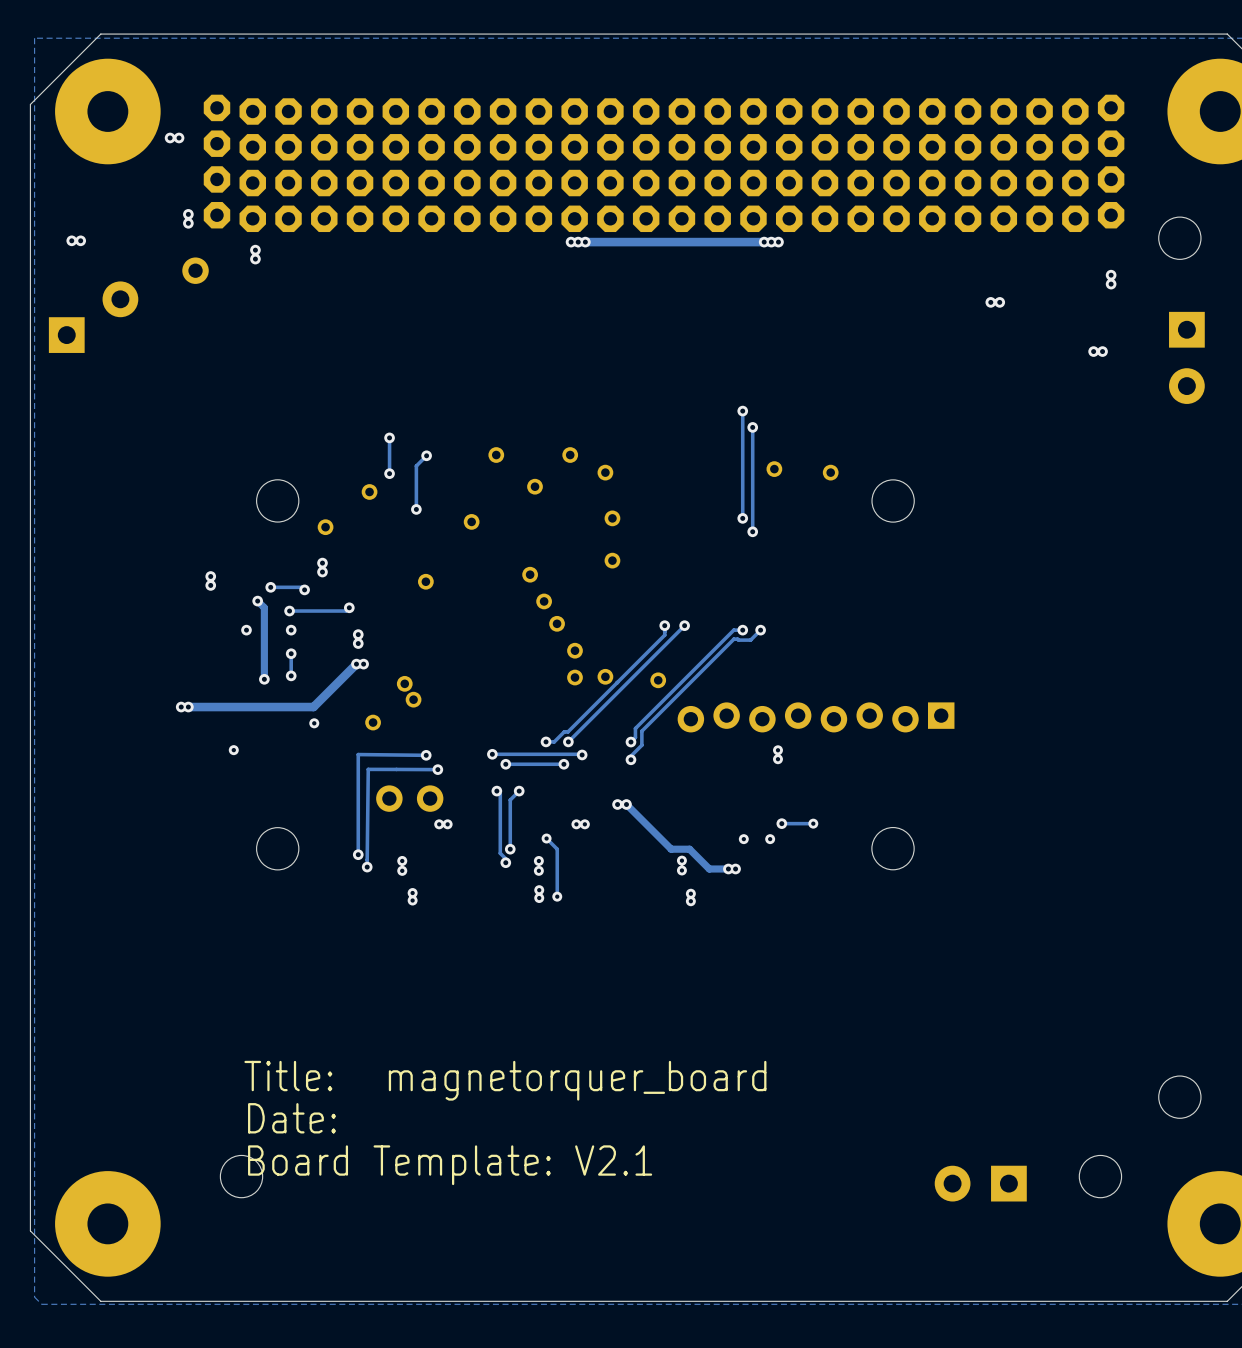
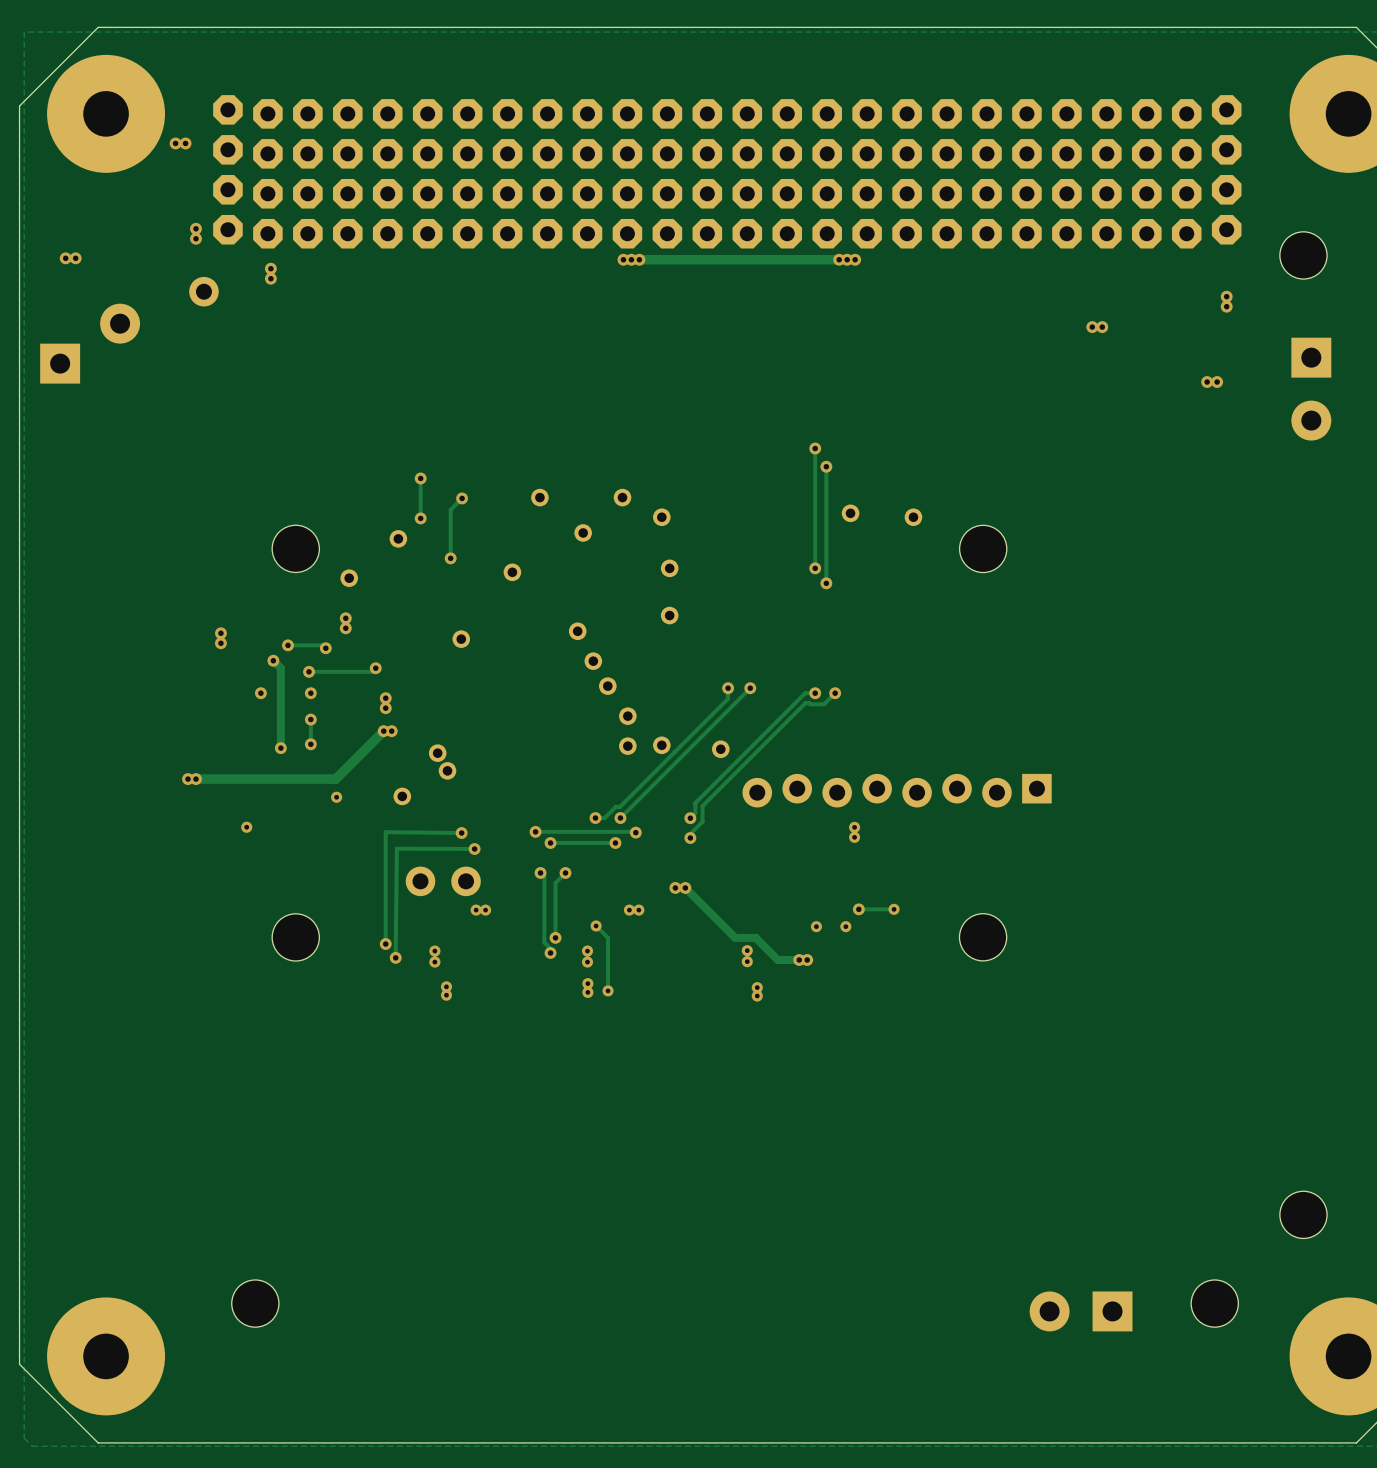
part text: Title: (288, 1076) -> none
part text: magnetorquer_board (577, 1080) -> none
part text: Date: (291, 1118) -> none
part text: Board Template: V2.1 (450, 1165) -> none

